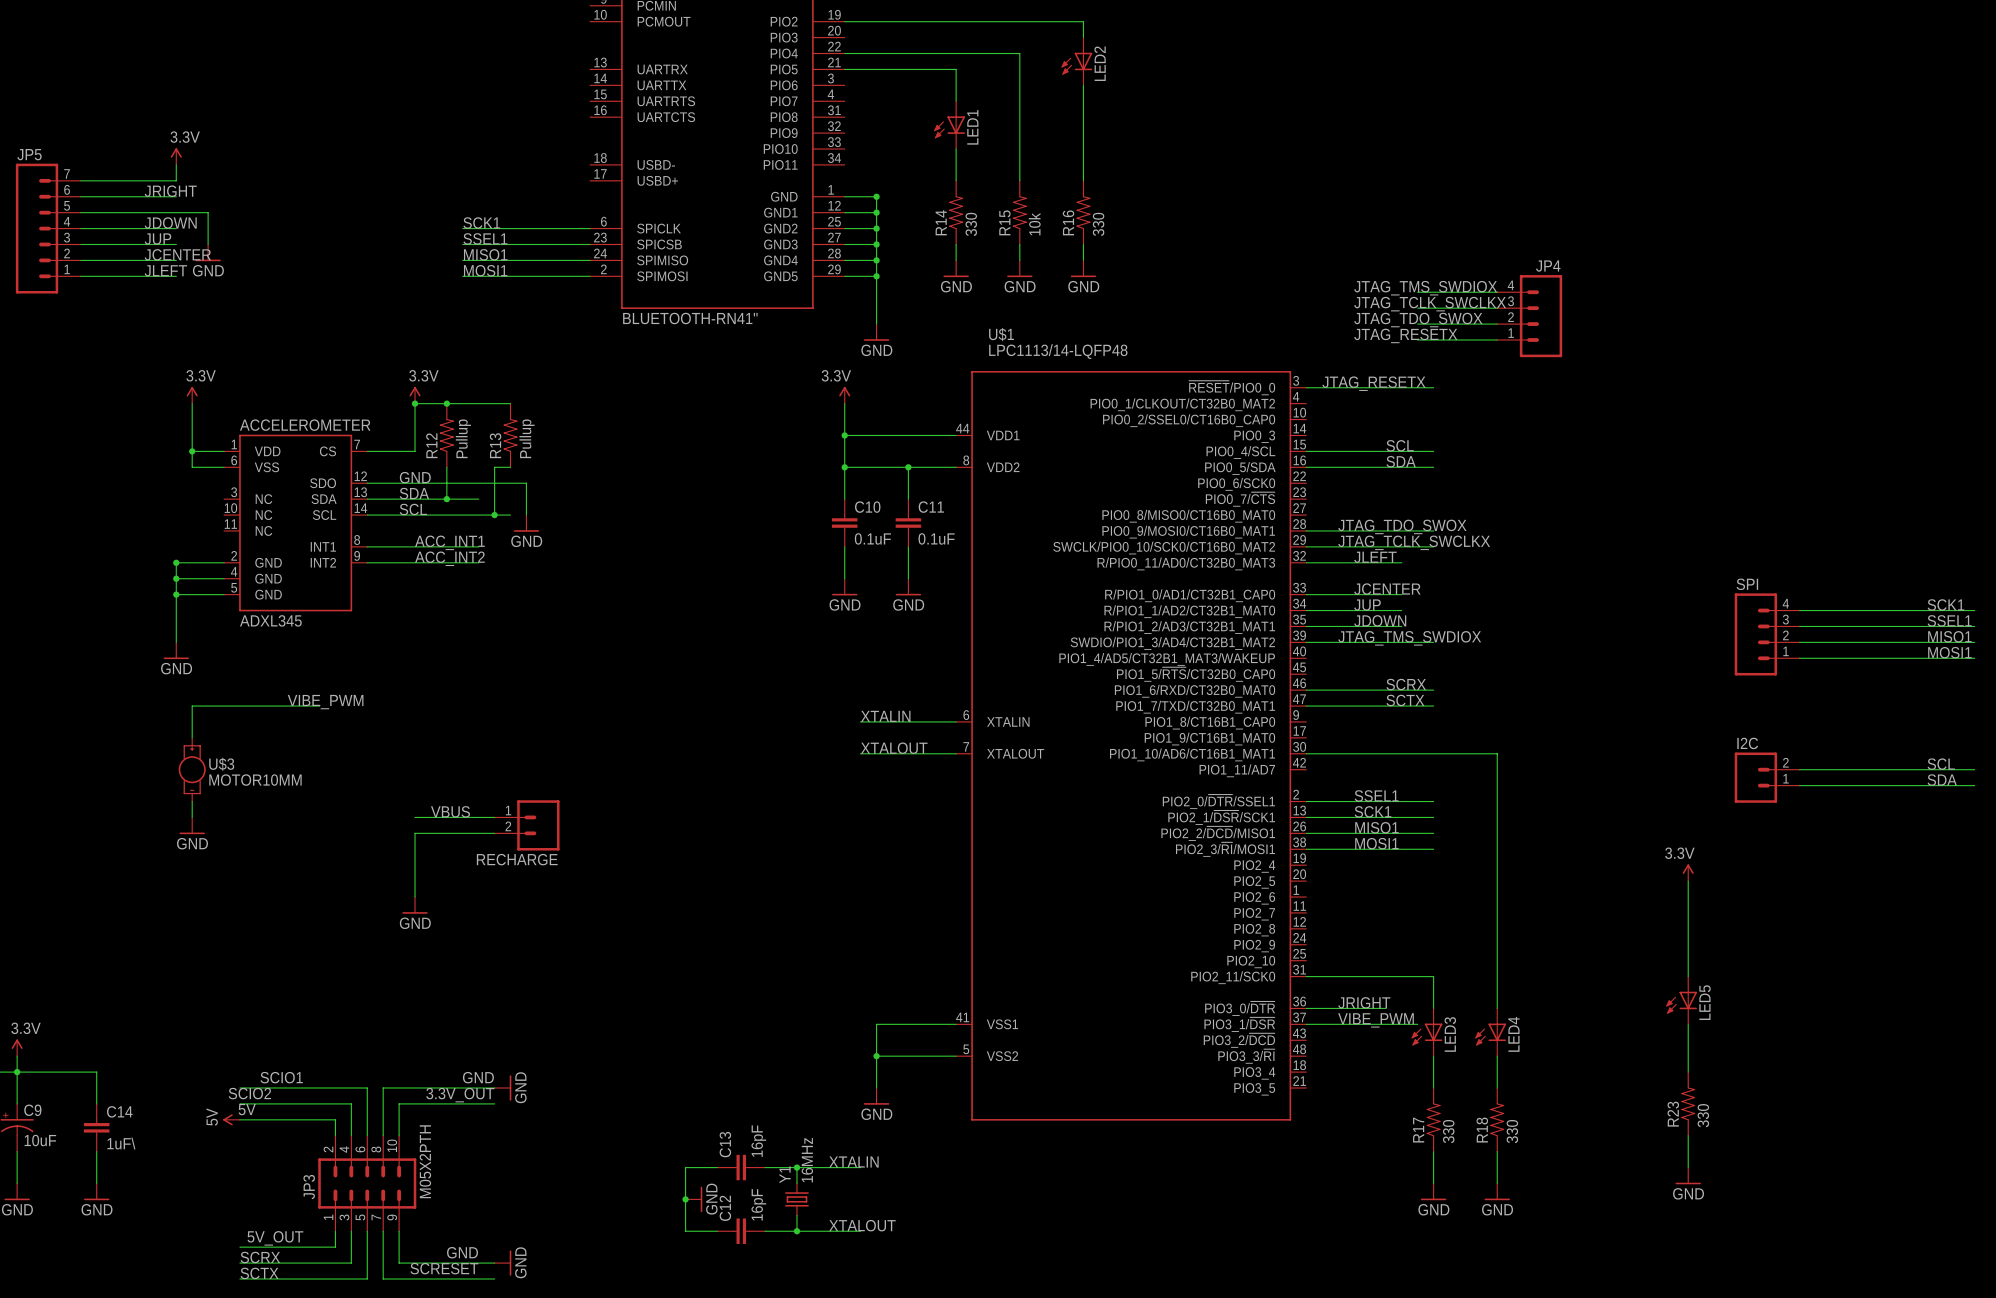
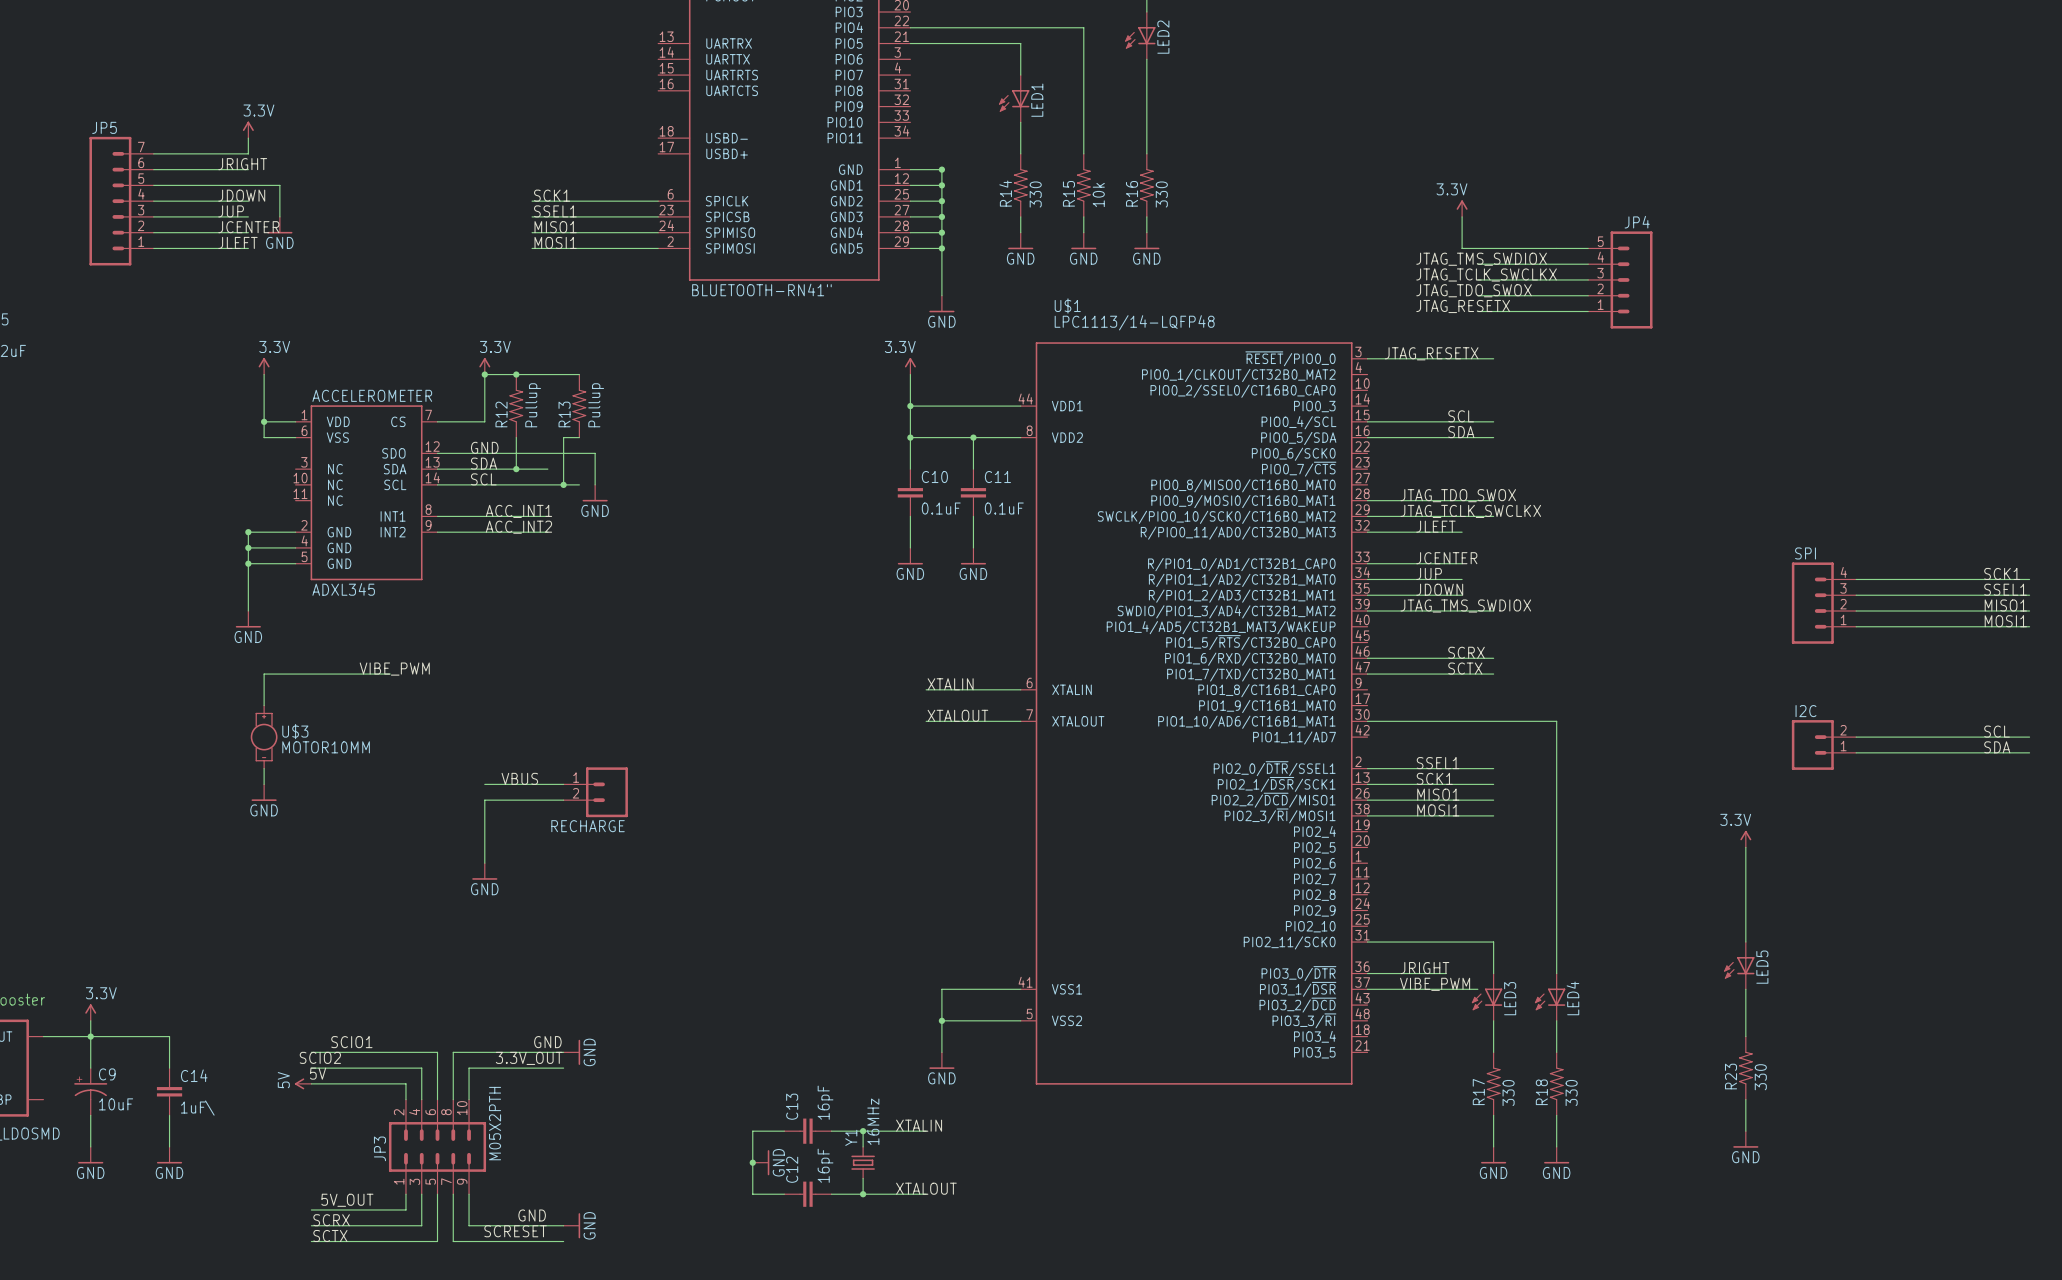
power symbol: none -> 3.3V (1462, 208)
wire: none -> (1462, 216) (1462, 248) (1588, 248)
JP4 symbol: [1497, 275, 1563, 358] -> [1588, 231, 1653, 329]

